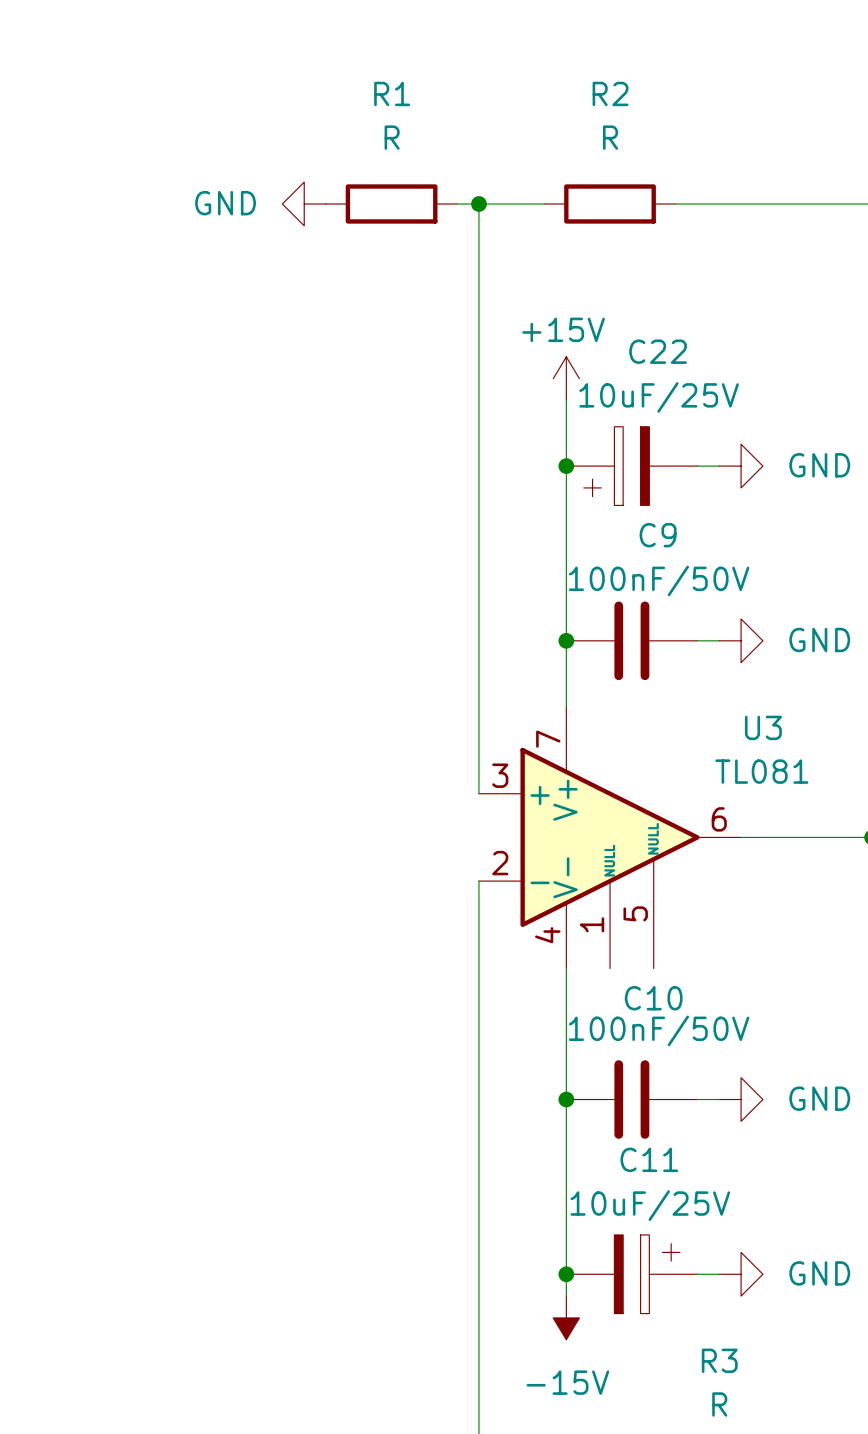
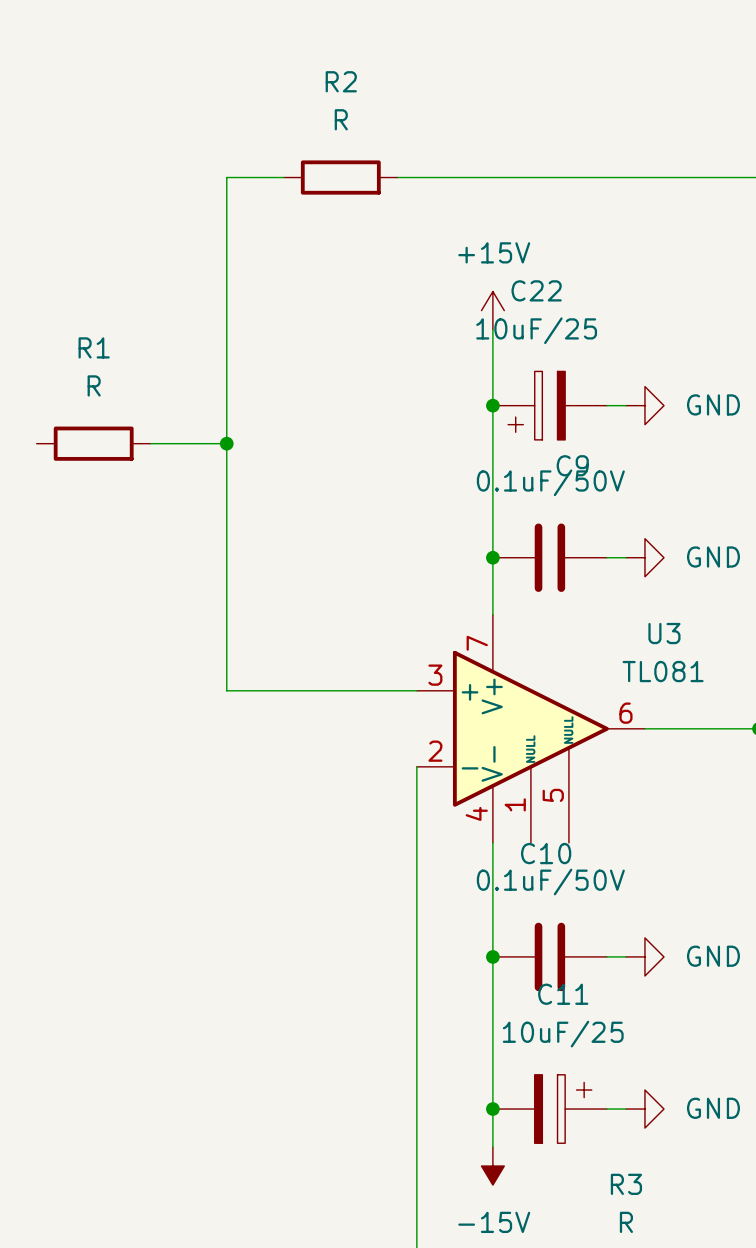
R1 name: R1 (392, 93) -> R2 (341, 81)
power symbol: GND (304, 203) -> none
wire: (478, 203) (478, 793) -> (283, 177) (226, 177) (226, 690) (416, 690)
junction: (478, 203) -> none
wire: none -> (473, 177) (587, 177)
R2: R (610, 203) -> none
power symbol text position: +15V (563, 329) -> +15V (494, 252)
C22 name position: C22 (658, 351) -> C22 (536, 290)
power symbol position: +15V (566, 378) -> +15V (492, 310)
C22 value: 10uF/25V (659, 397) -> 10uF/25 (536, 330)
R1: none -> R (93, 443)
wire: none -> (150, 443) (226, 443)
junction: none -> (226, 443)
C9 value: 100nF/50V (659, 580) -> 0.1uF/50V (550, 482)
C10 name position: C10 (653, 998) -> C10 (546, 853)
C10 value: 100nF/50V (659, 1030) -> 0.1uF/50V (550, 882)
C11 name position: C11 (649, 1159) -> C11 (563, 994)
C11 value: 10uF/25V (650, 1205) -> 10uF/25 (563, 1034)
power symbol position: -15V (566, 1317) -> -15V (492, 1166)

